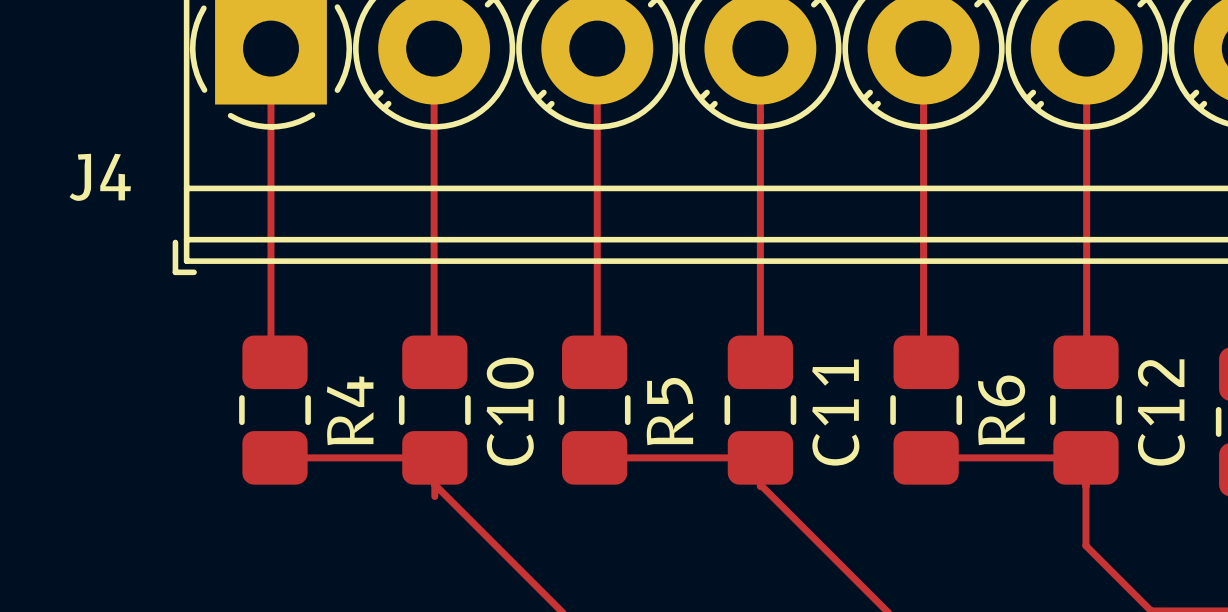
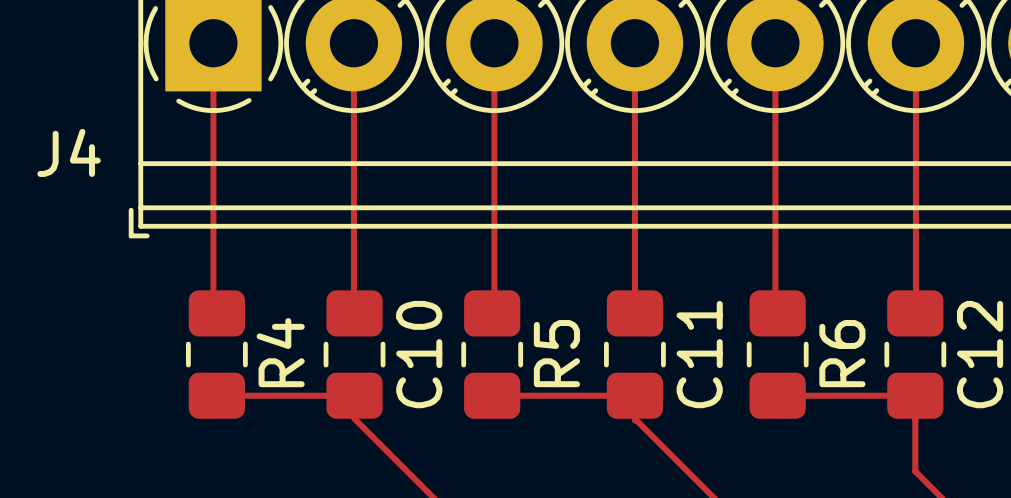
top track: (434, 484) (434, 496) -> none

